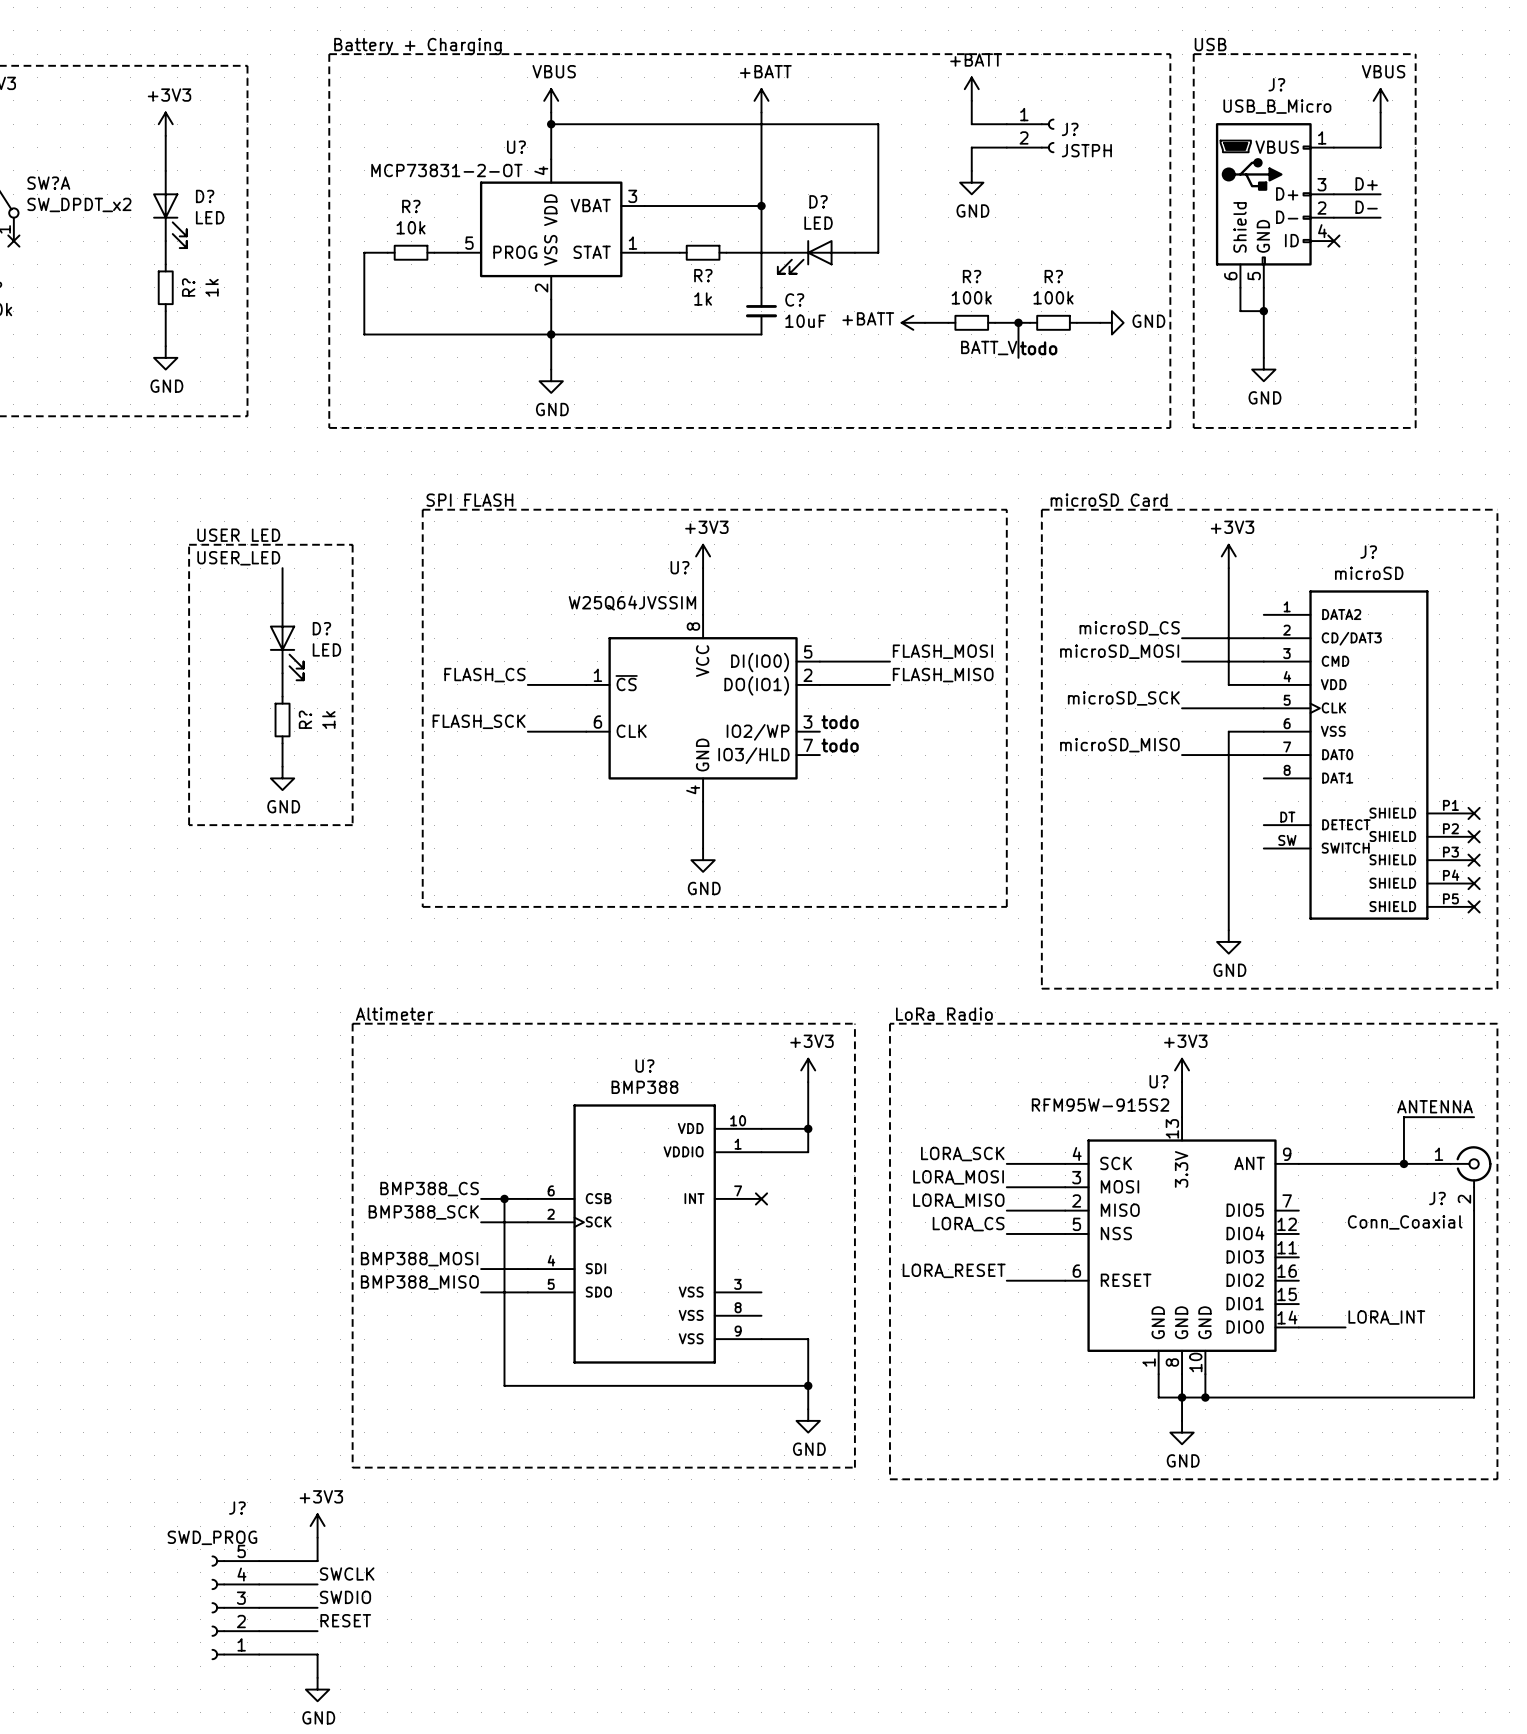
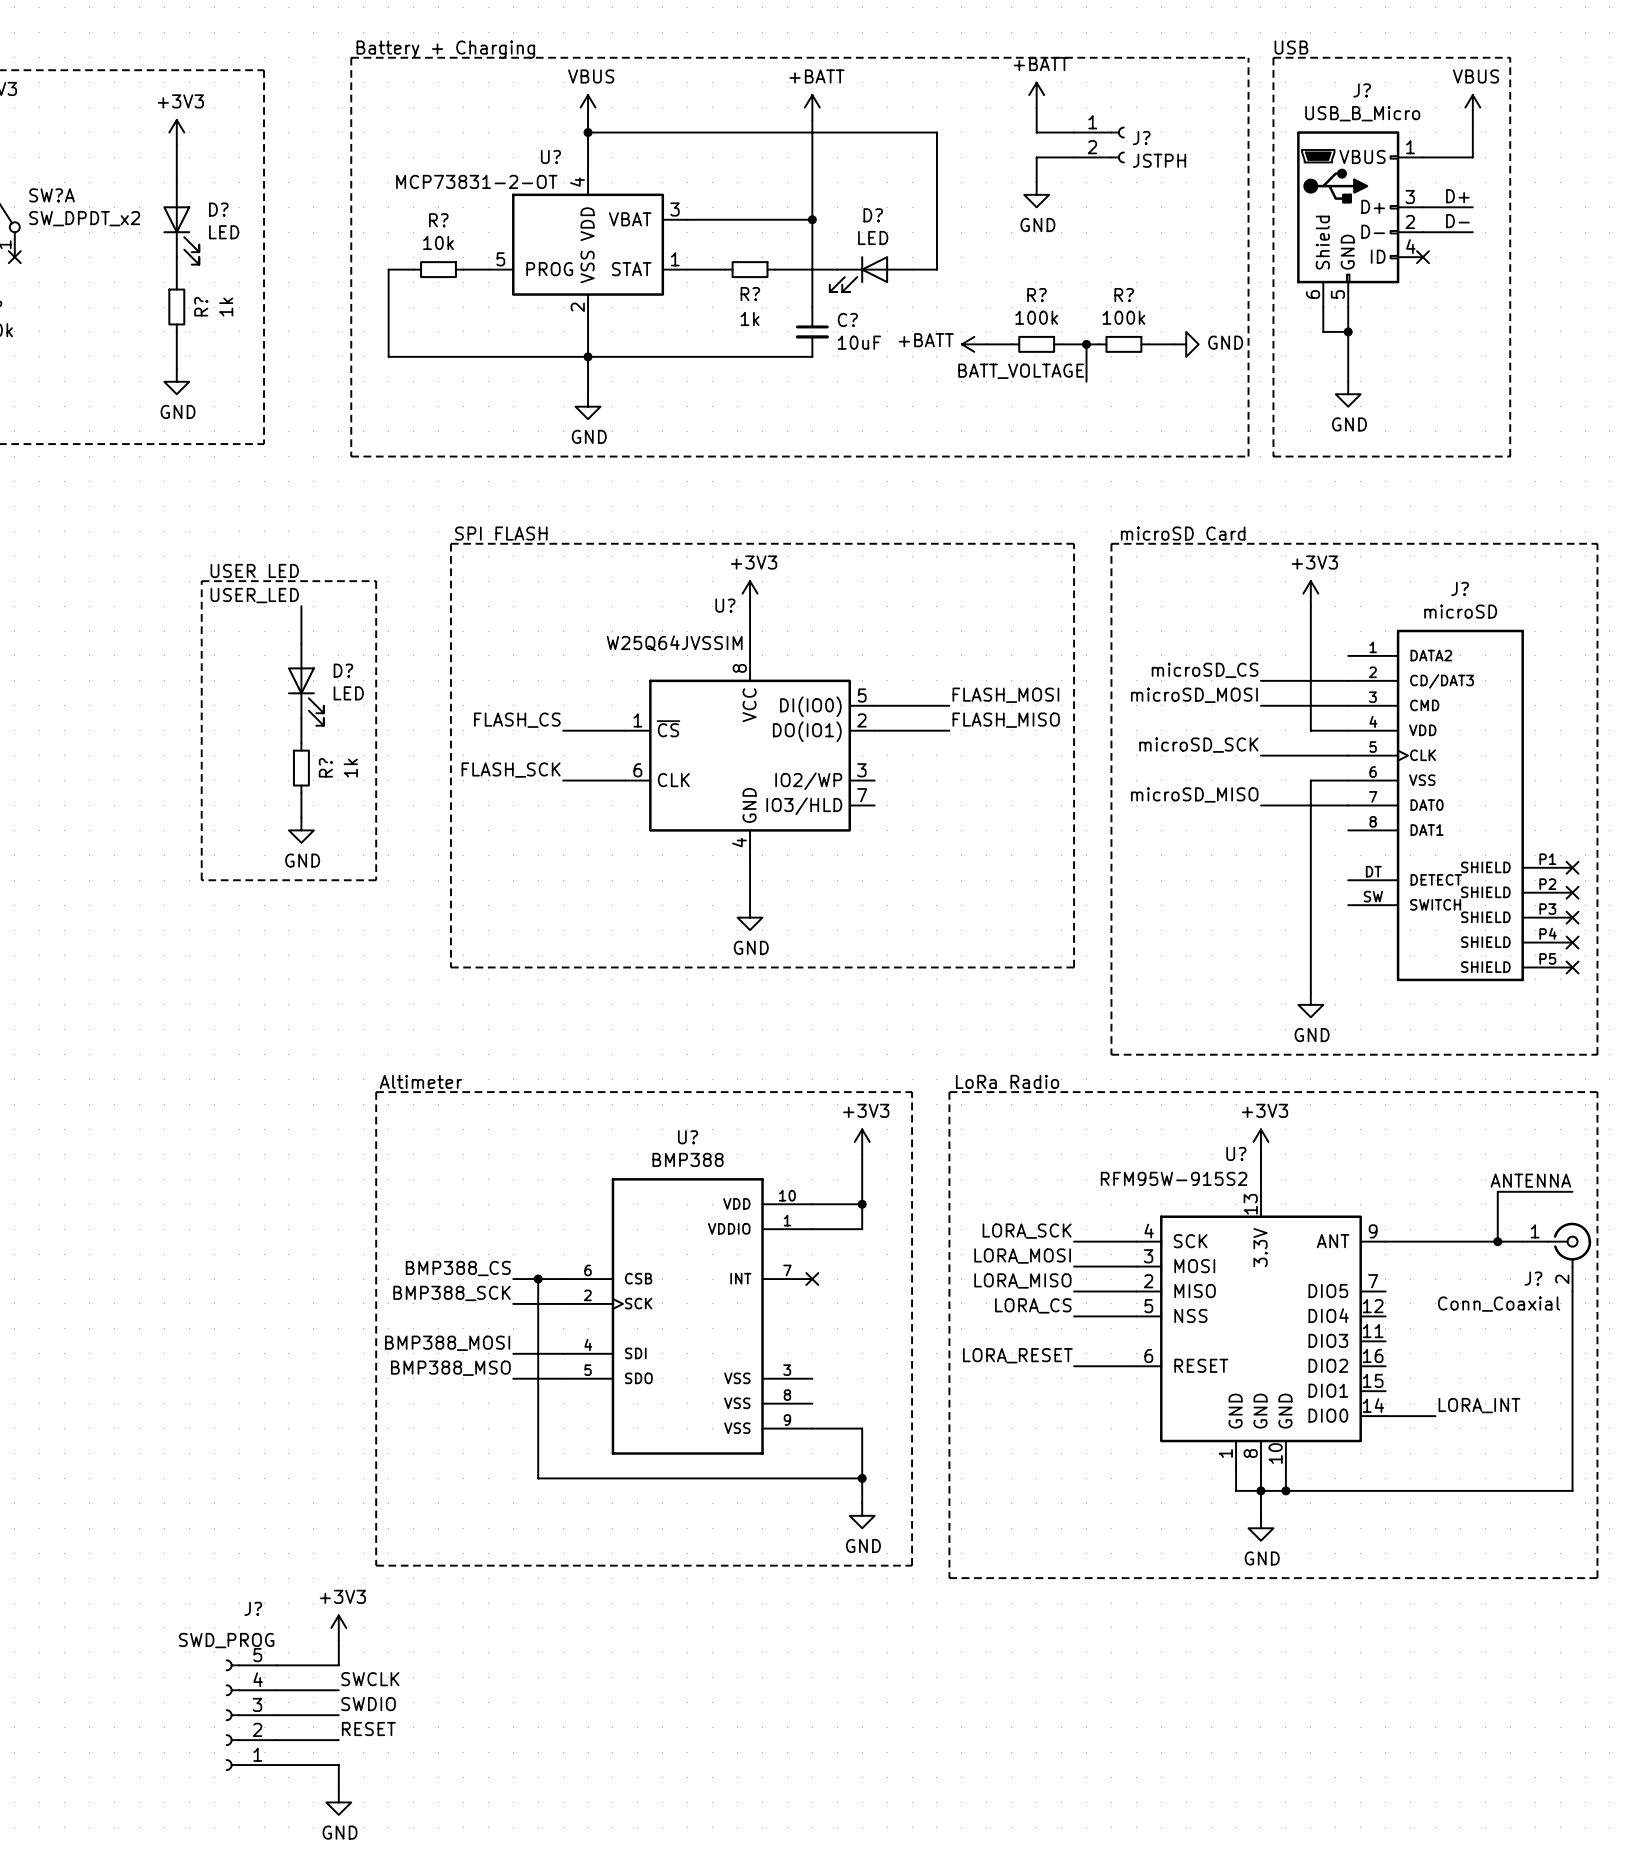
label: BATT_V (989, 348) -> BATT_VOLTAGE (1021, 371)
text: todo (1038, 348) -> none
text: todo (840, 722) -> none
text: todo (840, 745) -> none
label: BMP388_MISO (419, 1282) -> BMP388_MSO (450, 1368)

